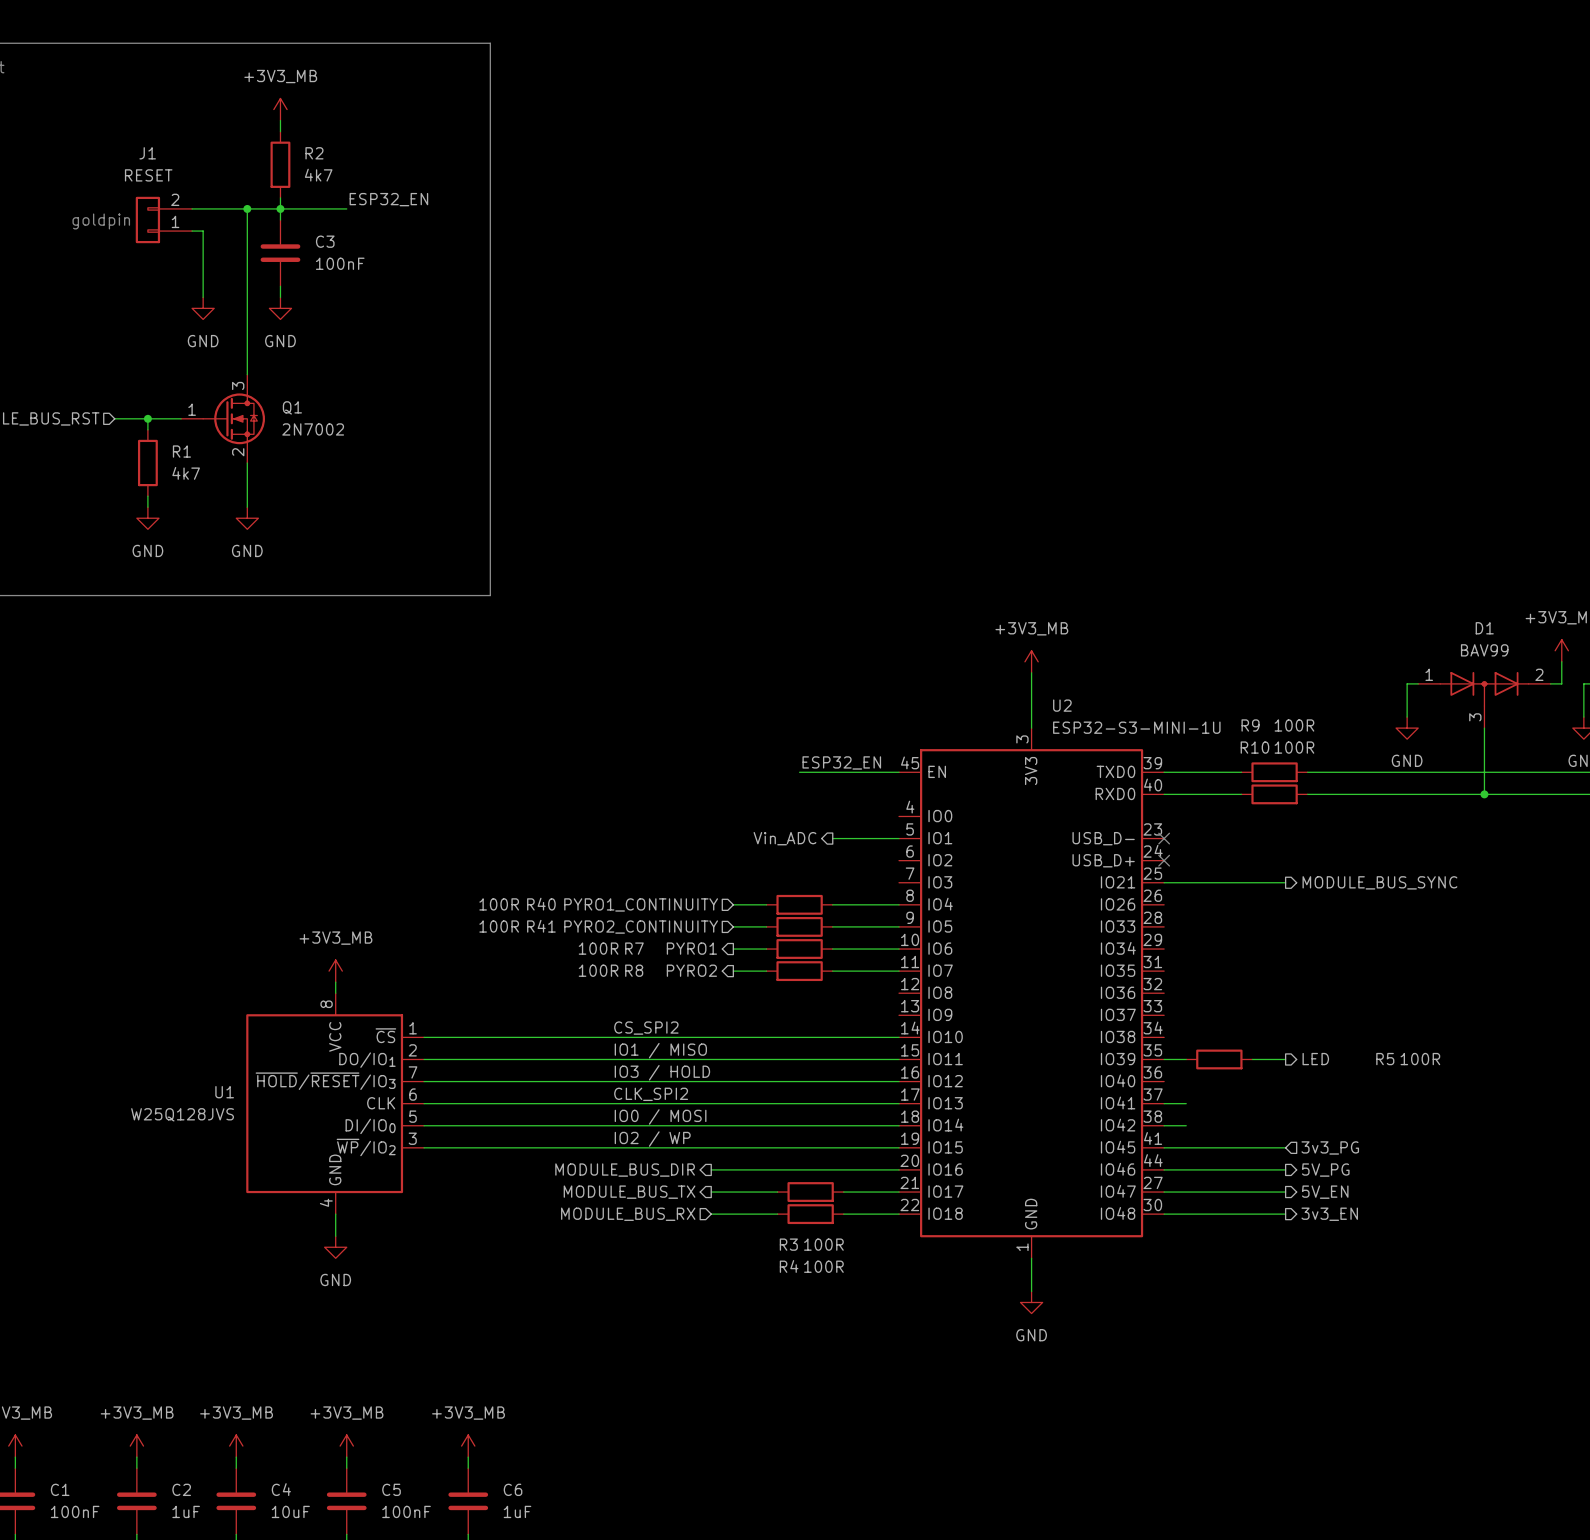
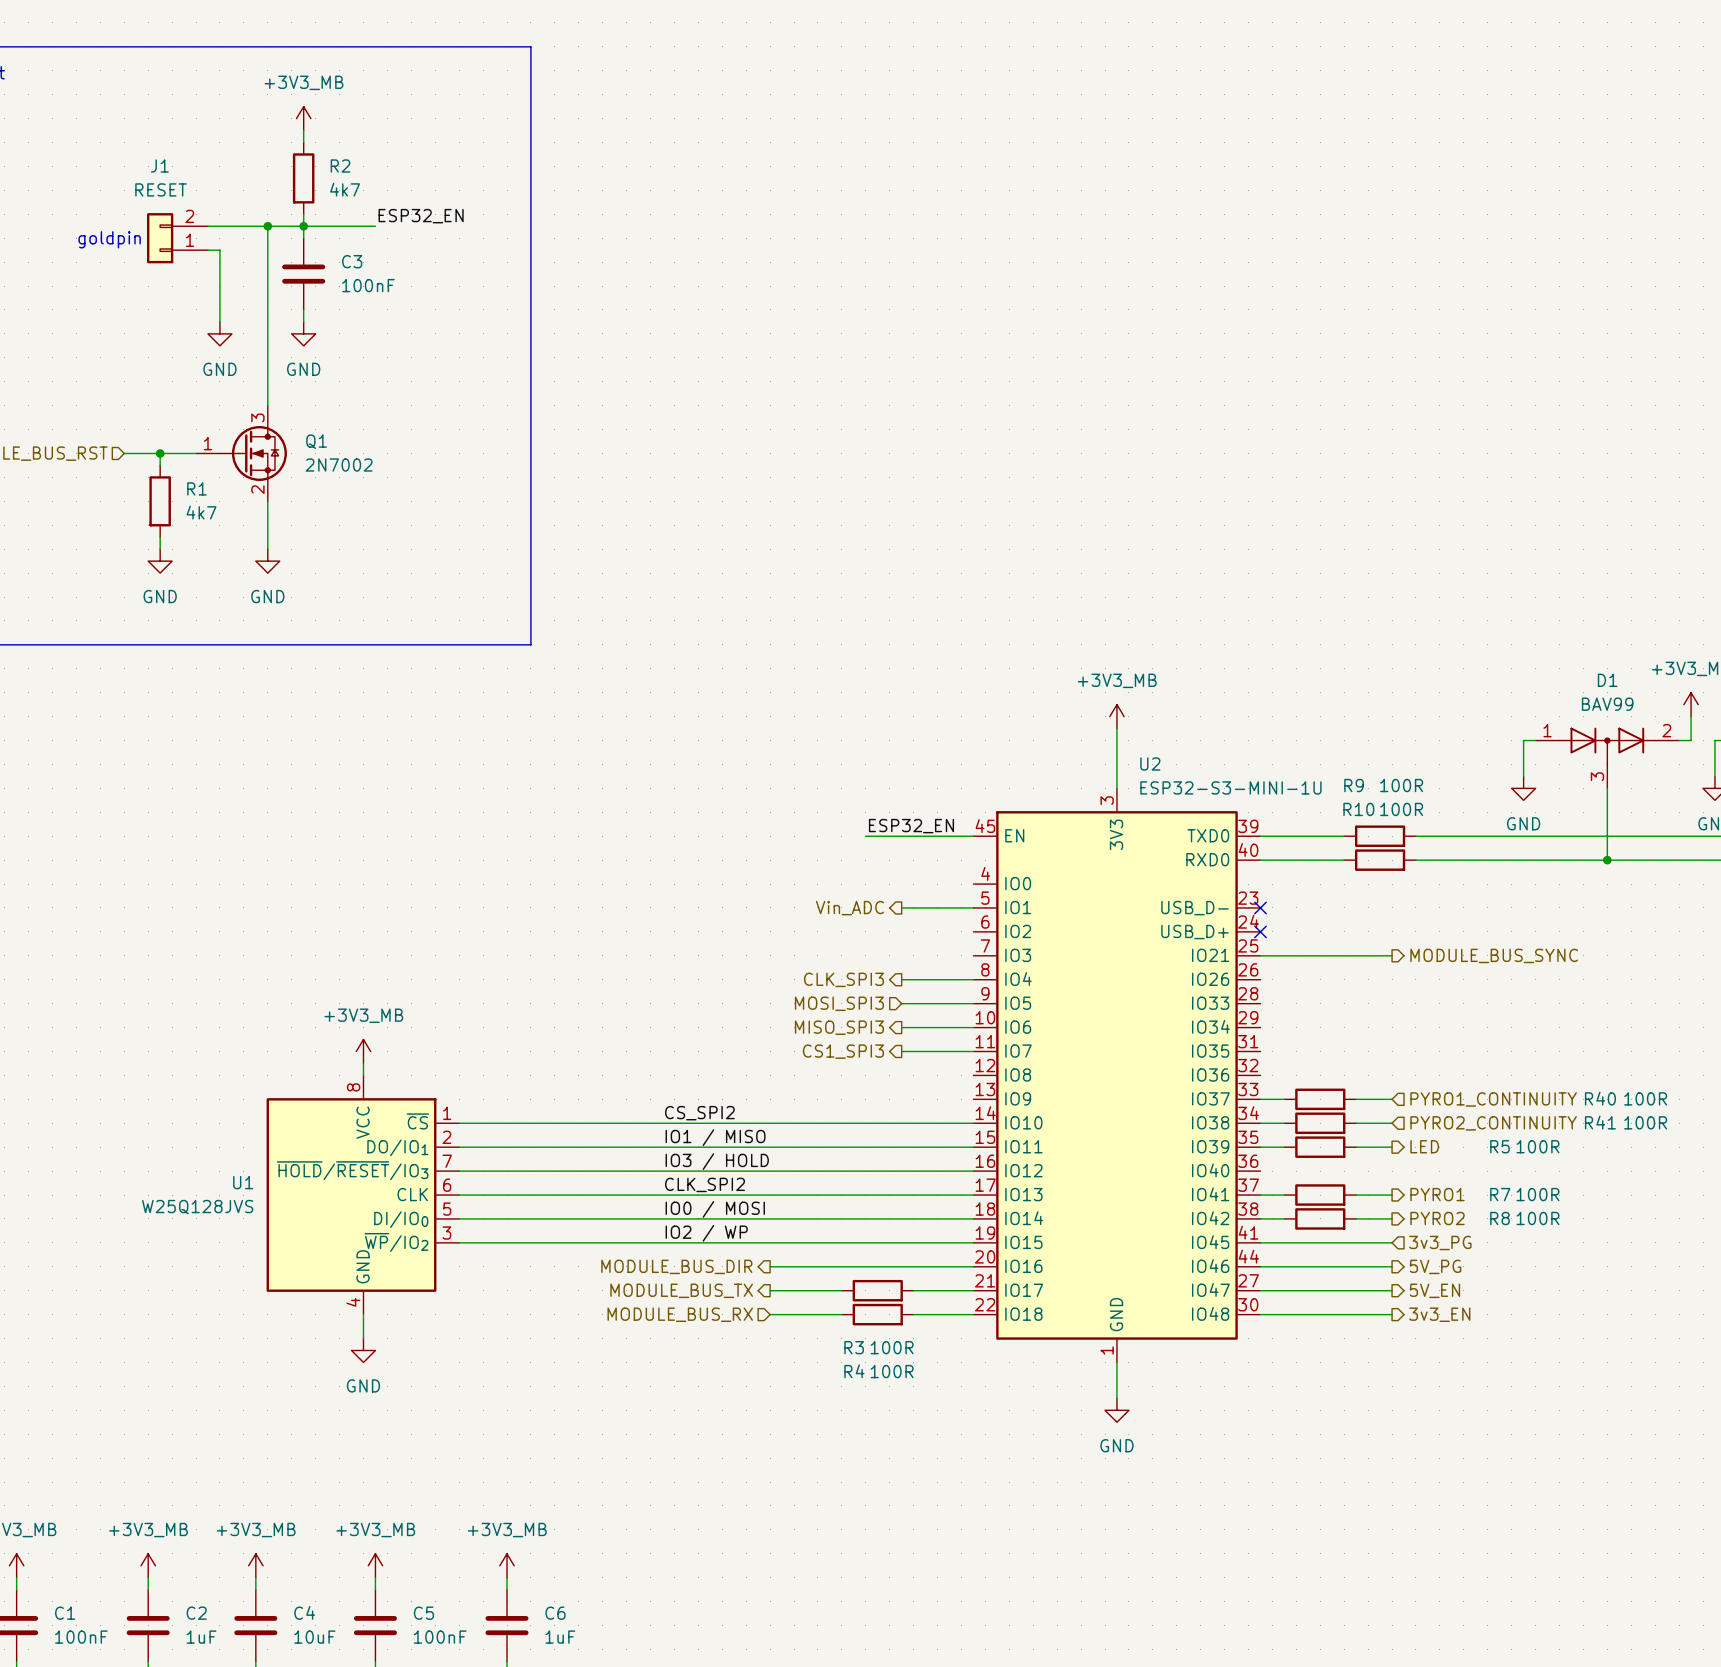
R40 value position: 100R (499, 904) -> 100R (1645, 1098)
R40 name position: R40 (541, 904) -> R40 (1600, 1098)
hierarchical label: PYRO1_CONTINUITY (641, 904) -> none
wire: (733, 904) (766, 904) -> none
hierarchical label: none -> CLK_SPI3 (843, 979)
R40 position: (799, 904) -> (1320, 1099)
R41 value position: 100R (499, 926) -> 100R (1645, 1122)
R41 name position: R41 (541, 926) -> R41 (1600, 1122)
wire: (733, 926) (766, 926) -> none
R41 position: (799, 926) -> (1320, 1123)
hierarchical label: PYRO2_CONTINUITY (641, 927) -> none
hierarchical label: none -> MOSI_SPI3 (839, 1003)
R7 value position: 100R (598, 948) -> 100R (1537, 1194)
R7 name position: R7 (634, 948) -> R7 (1500, 1194)
hierarchical label: PYRO1 (691, 948) -> none
wire: (733, 949) (766, 949) -> none
hierarchical label: none -> MISO_SPI3 (839, 1027)
R7 position: (799, 949) -> (1320, 1195)
R8 value position: 100R (598, 970) -> 100R (1537, 1218)
R8 name position: R8 (634, 970) -> R8 (1499, 1218)
hierarchical label: PYRO2 (691, 970) -> none
wire: (733, 971) (766, 971) -> none
hierarchical label: none -> CS1_SPI3 (843, 1051)
R8 position: (799, 971) -> (1320, 1218)
wire: none -> (1260, 1099) (1284, 1099)
wire: none -> (1356, 1099) (1392, 1099)
hierarchical label: none -> PYRO1_CONTINUITY (1493, 1099)
wire: none -> (1260, 1123) (1284, 1123)
wire: none -> (1356, 1123) (1392, 1123)
hierarchical label: none -> PYRO2_CONTINUITY (1493, 1123)
wire: none -> (1356, 1195) (1392, 1195)
hierarchical label: none -> PYRO1 (1437, 1194)
wire: none -> (1356, 1218) (1392, 1218)
hierarchical label: none -> PYRO2 (1437, 1218)

